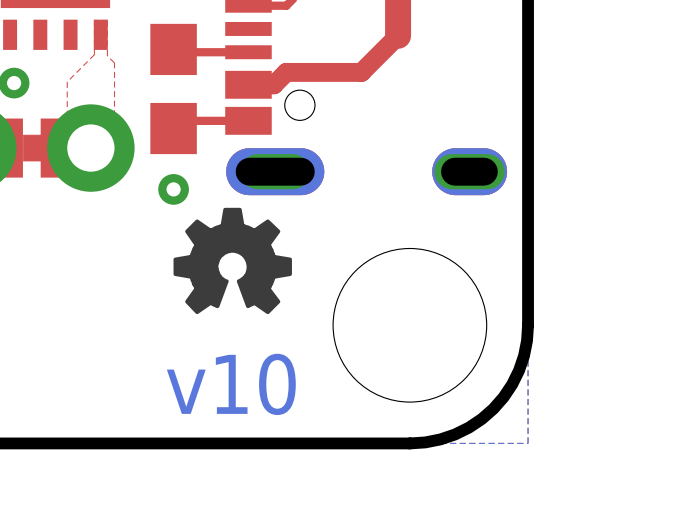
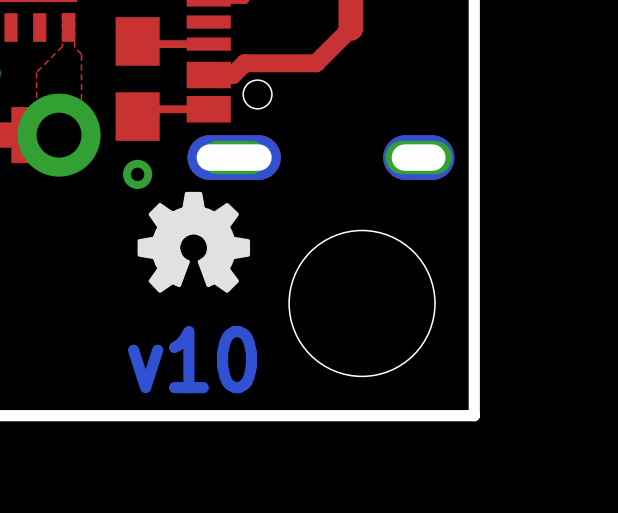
board edge: (528, 325) (524, 355) (519, 370) (503, 397) (493, 408) (481, 419) (455, 434) (440, 439) (409, 443) -> (474, 303) (474, 415) (362, 415)

